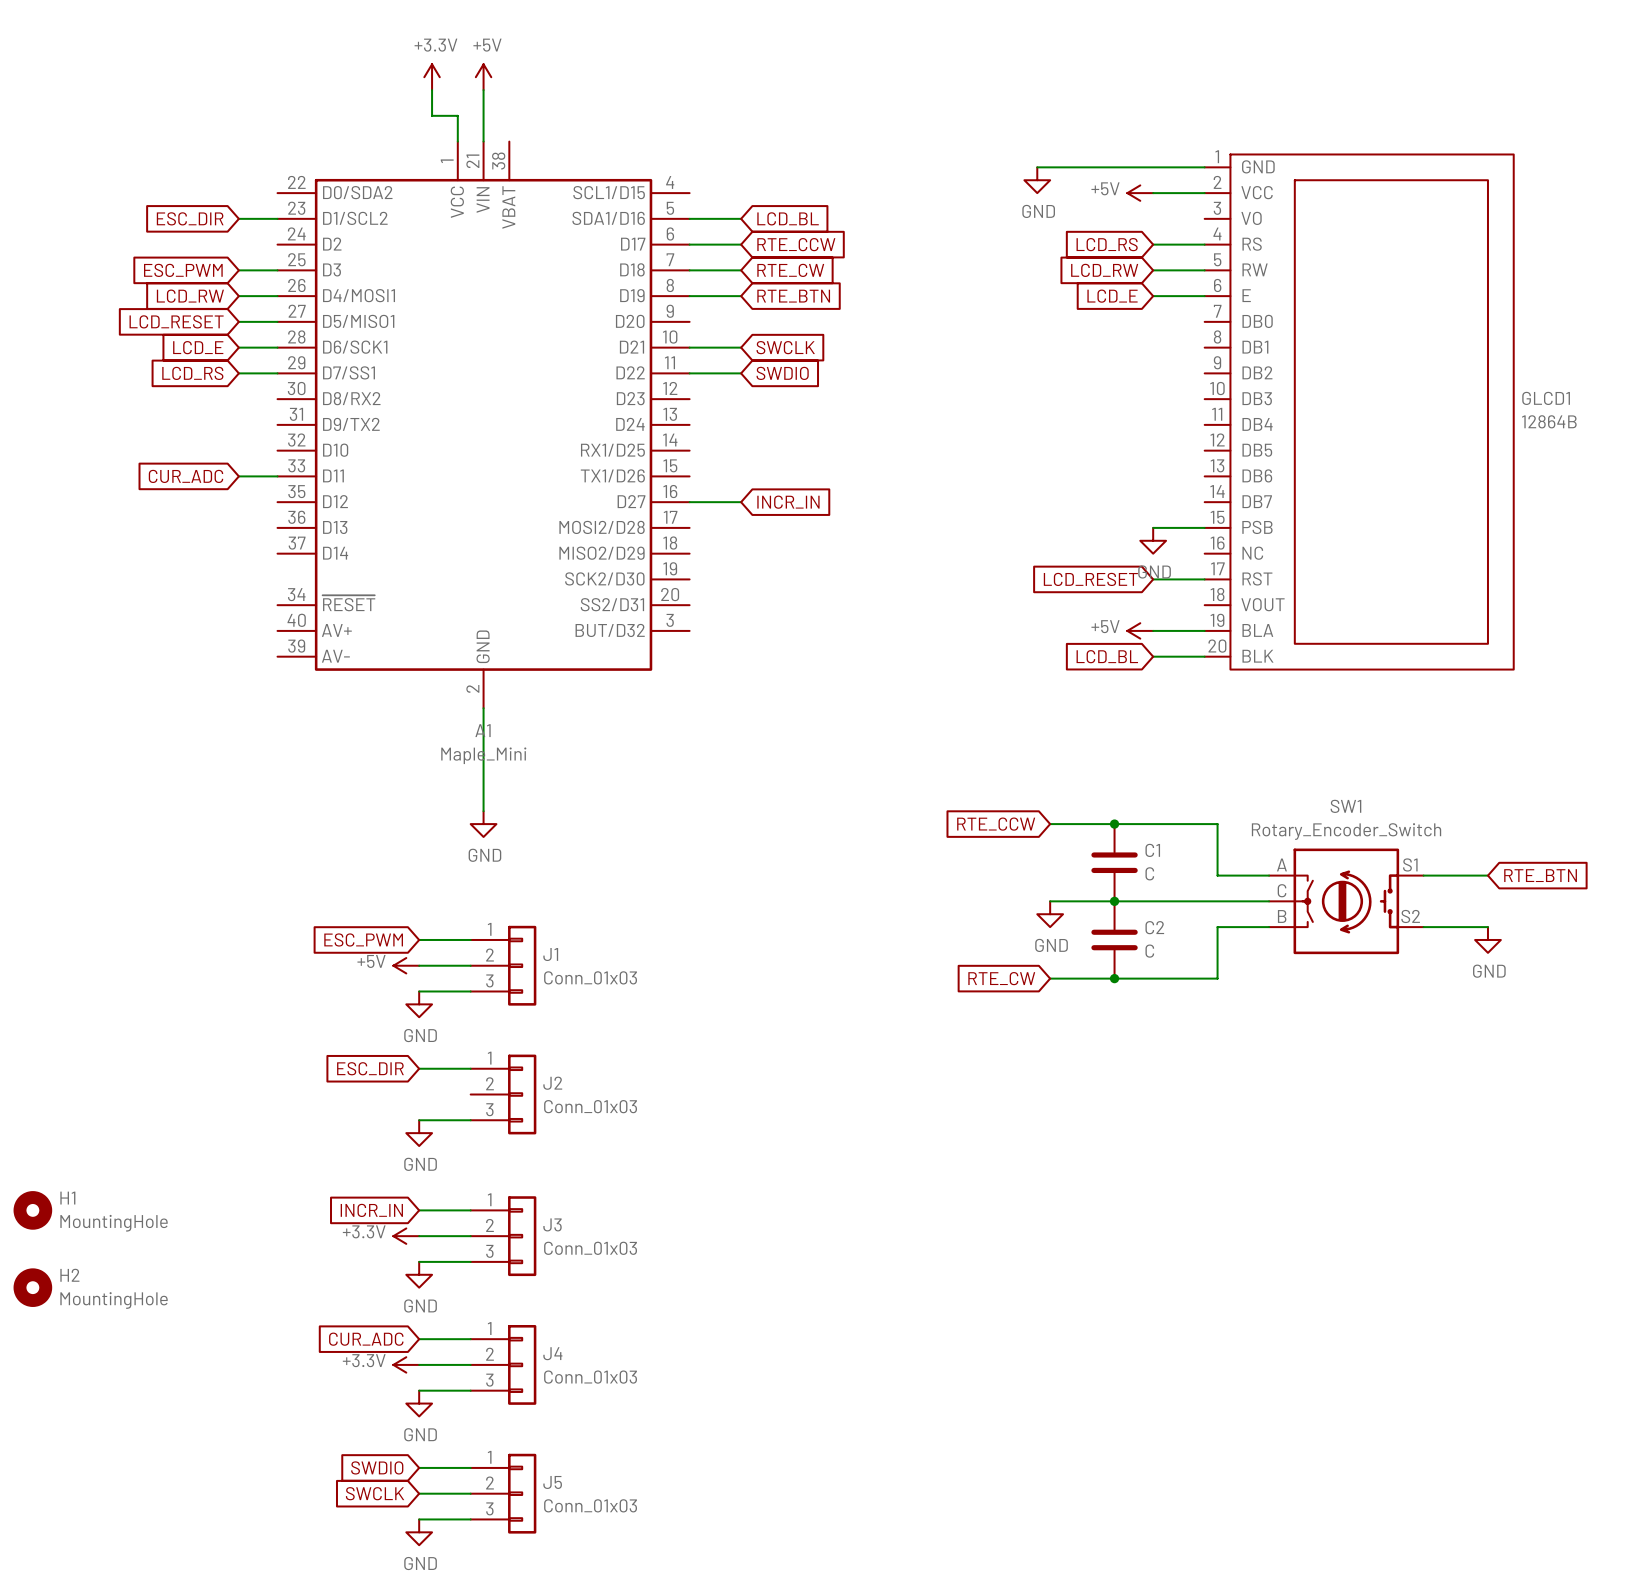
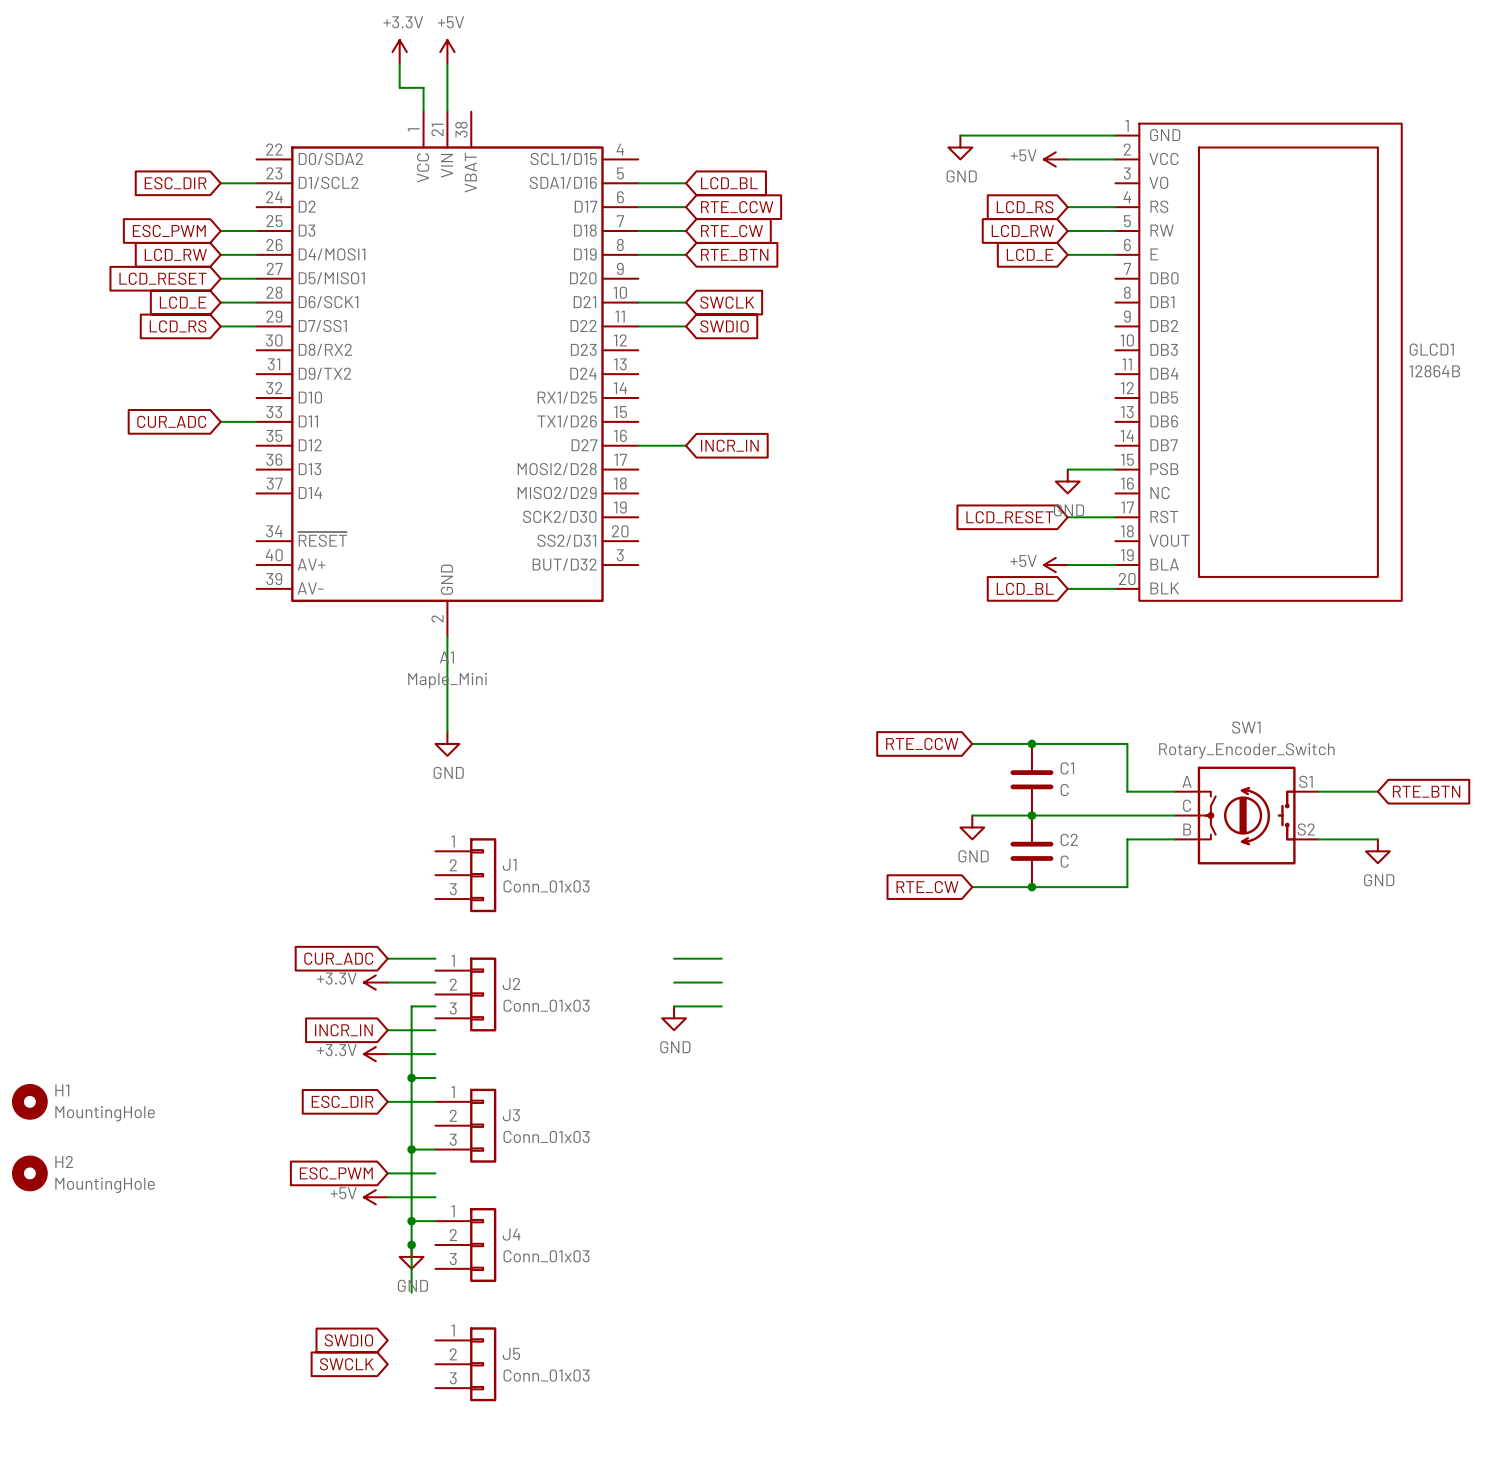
global label: ESC_PWM (363, 939) -> none
wire: (419, 939) (470, 939) -> (387, 1030) (435, 1030)
power symbol: +5V (406, 965) -> none
wire: (419, 965) (470, 965) -> (387, 958) (435, 958)
wire: (419, 991) (470, 991) -> (387, 982) (435, 982)
power symbol: GND (419, 1004) -> none
global label: none -> CUR_ADC (338, 958)
wire: none -> (674, 958) (721, 958)
global label: ESC_DIR (370, 1068) -> none
wire: (419, 1068) (470, 1068) -> none
power symbol: none -> +3.3V (375, 982)
wire: none -> (674, 982) (721, 982)
wire: none -> (435, 1006) (411, 1006) (411, 1292)
wire: none -> (674, 1006) (721, 1006)
wire: (419, 1120) (470, 1120) -> none
power symbol: none -> GND (674, 1018)
global label: none -> INCR_IN (343, 1030)
power symbol: GND (419, 1133) -> none
power symbol: none -> +3.3V (375, 1054)
junction: none -> (411, 1077)
global label: INCR_IN (371, 1210) -> ESC_DIR (342, 1101)
power symbol: +3.3V (406, 1236) -> none
wire: (419, 1236) (470, 1236) -> (387, 1054) (435, 1054)
wire: (419, 1261) (444, 1261) -> (411, 1077) (435, 1077)
junction: none -> (411, 1149)
power symbol: GND (419, 1274) -> none
global label: none -> ESC_PWM (336, 1173)
power symbol: none -> +5V (375, 1197)
global label: CUR_ADC (366, 1339) -> none
wire: (419, 1339) (444, 1339) -> none
junction: none -> (411, 1221)
power symbol: +3.3V (406, 1364) -> none
wire: (419, 1364) (470, 1364) -> (387, 1173) (435, 1173)
junction: none -> (411, 1244)
wire: (419, 1390) (470, 1390) -> (387, 1197) (435, 1197)
power symbol position: GND (419, 1403) -> GND (411, 1256)
wire: (419, 1467) (470, 1467) -> none
wire: (419, 1493) (470, 1493) -> none
wire: (419, 1519) (470, 1519) -> none
power symbol: GND (419, 1532) -> none

